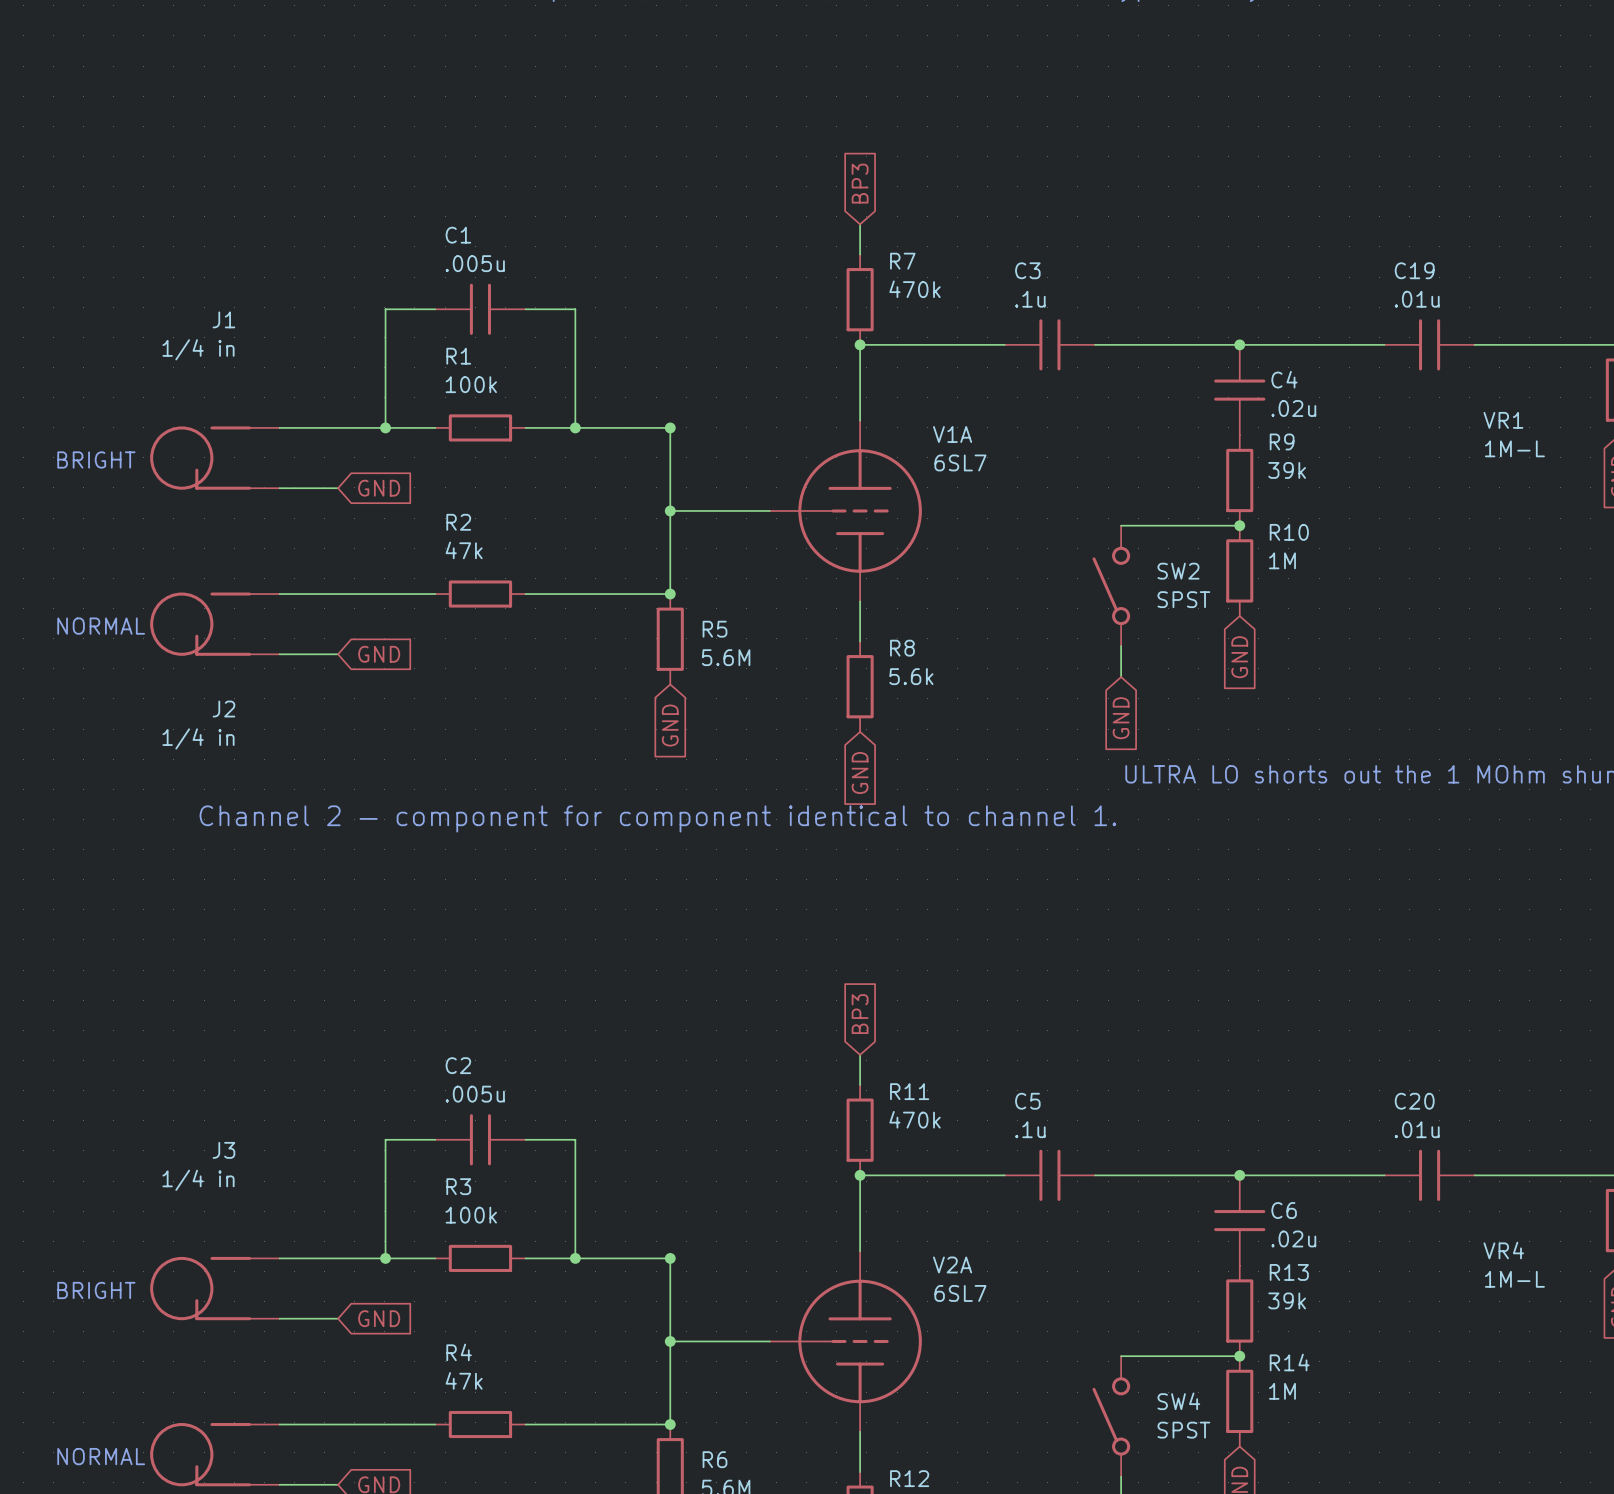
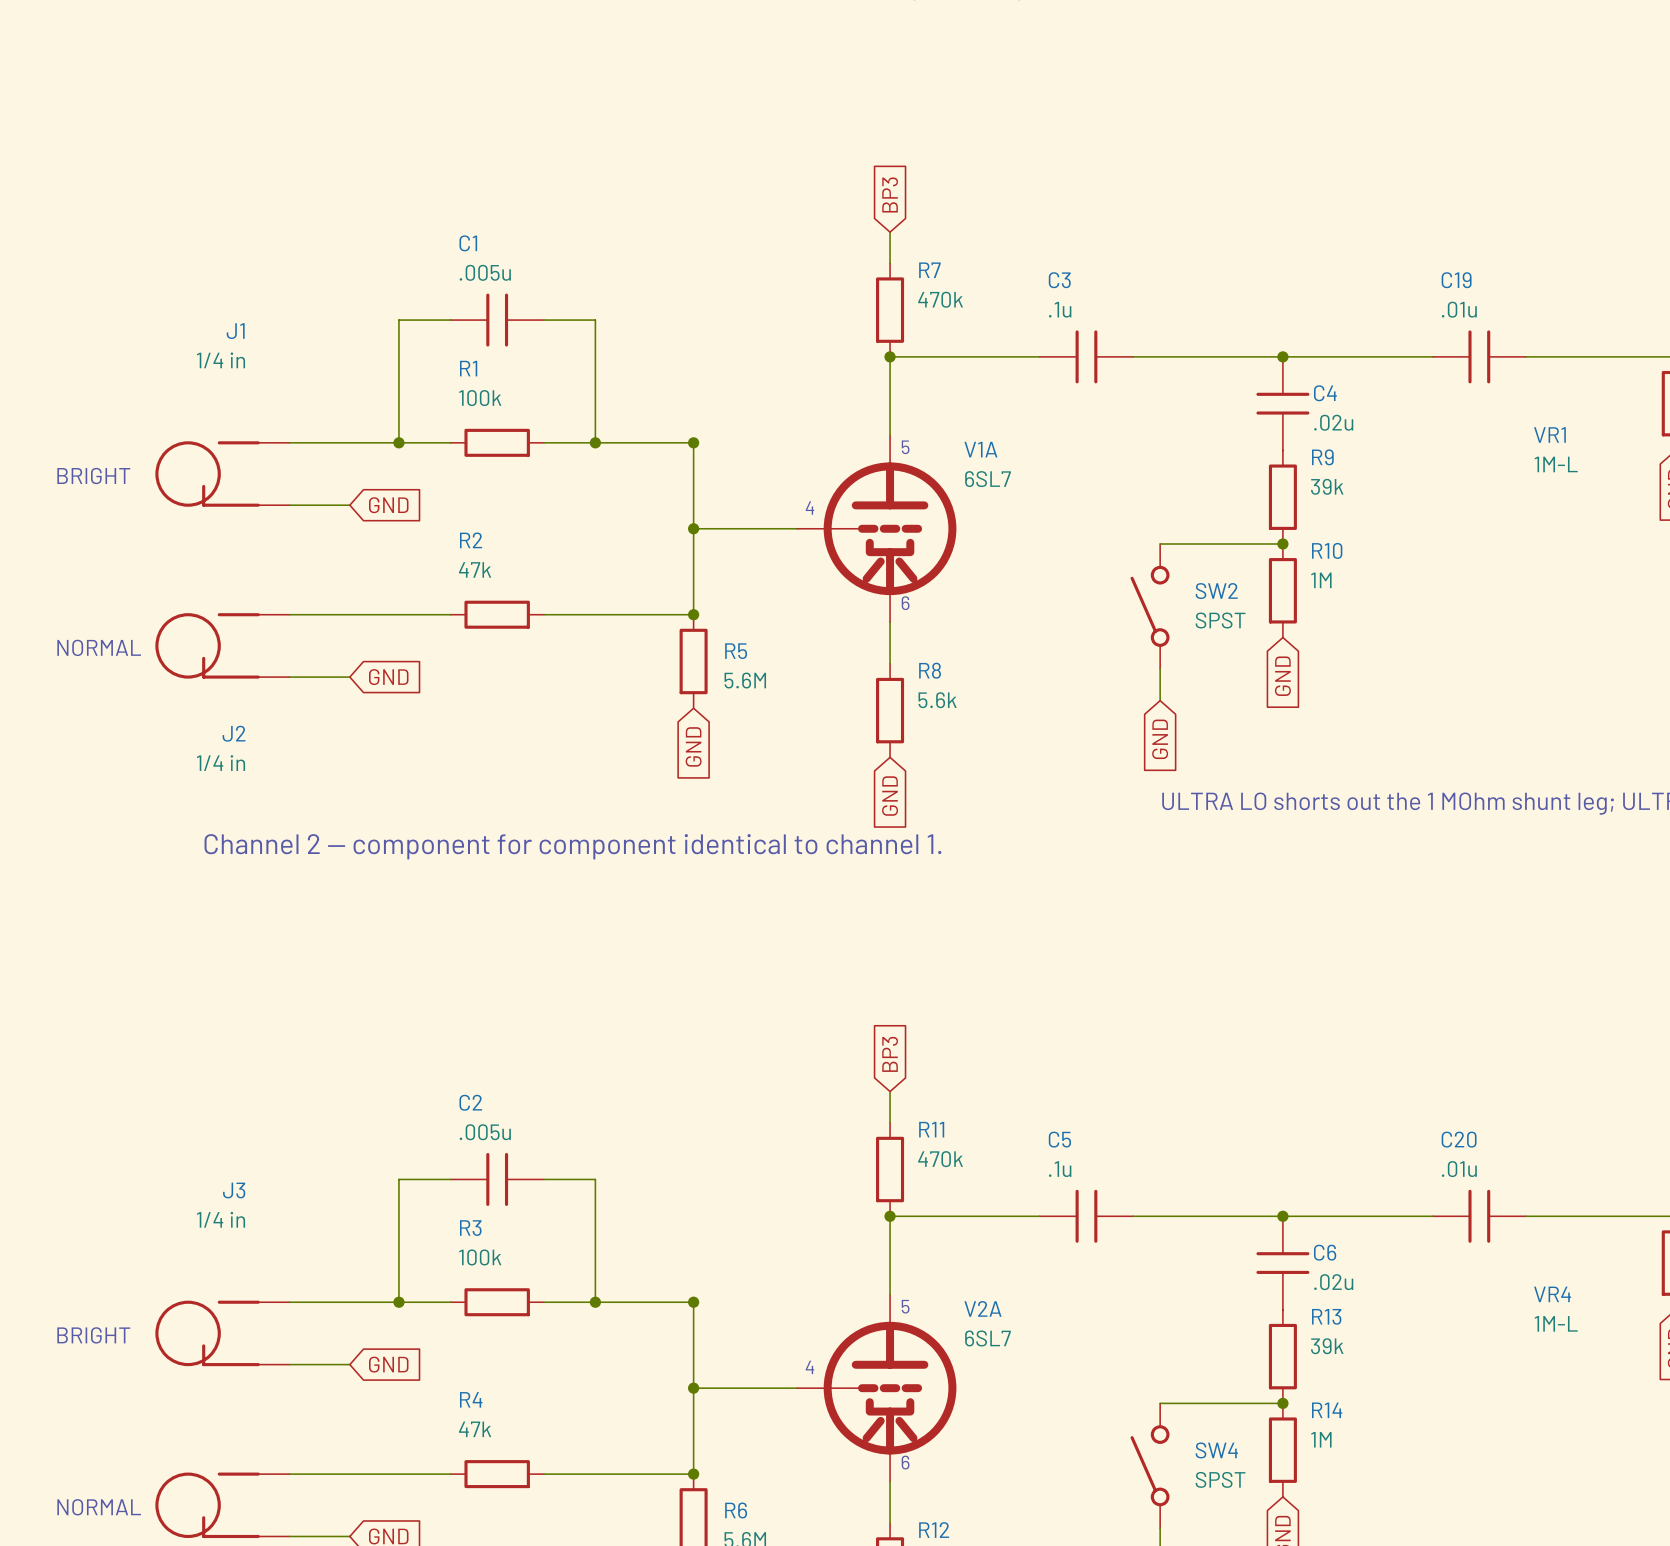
V1A symbol: [769, 420, 922, 602] -> [796, 435, 957, 623]
text: none -> 5 (905, 447)
text: none -> 4 (809, 508)
text: none -> 6 (905, 603)
V2A symbol: [769, 1251, 922, 1432] -> [796, 1294, 957, 1482]
text: none -> 5 (905, 1306)
text: none -> 4 (809, 1367)
text: none -> 6 (905, 1462)

